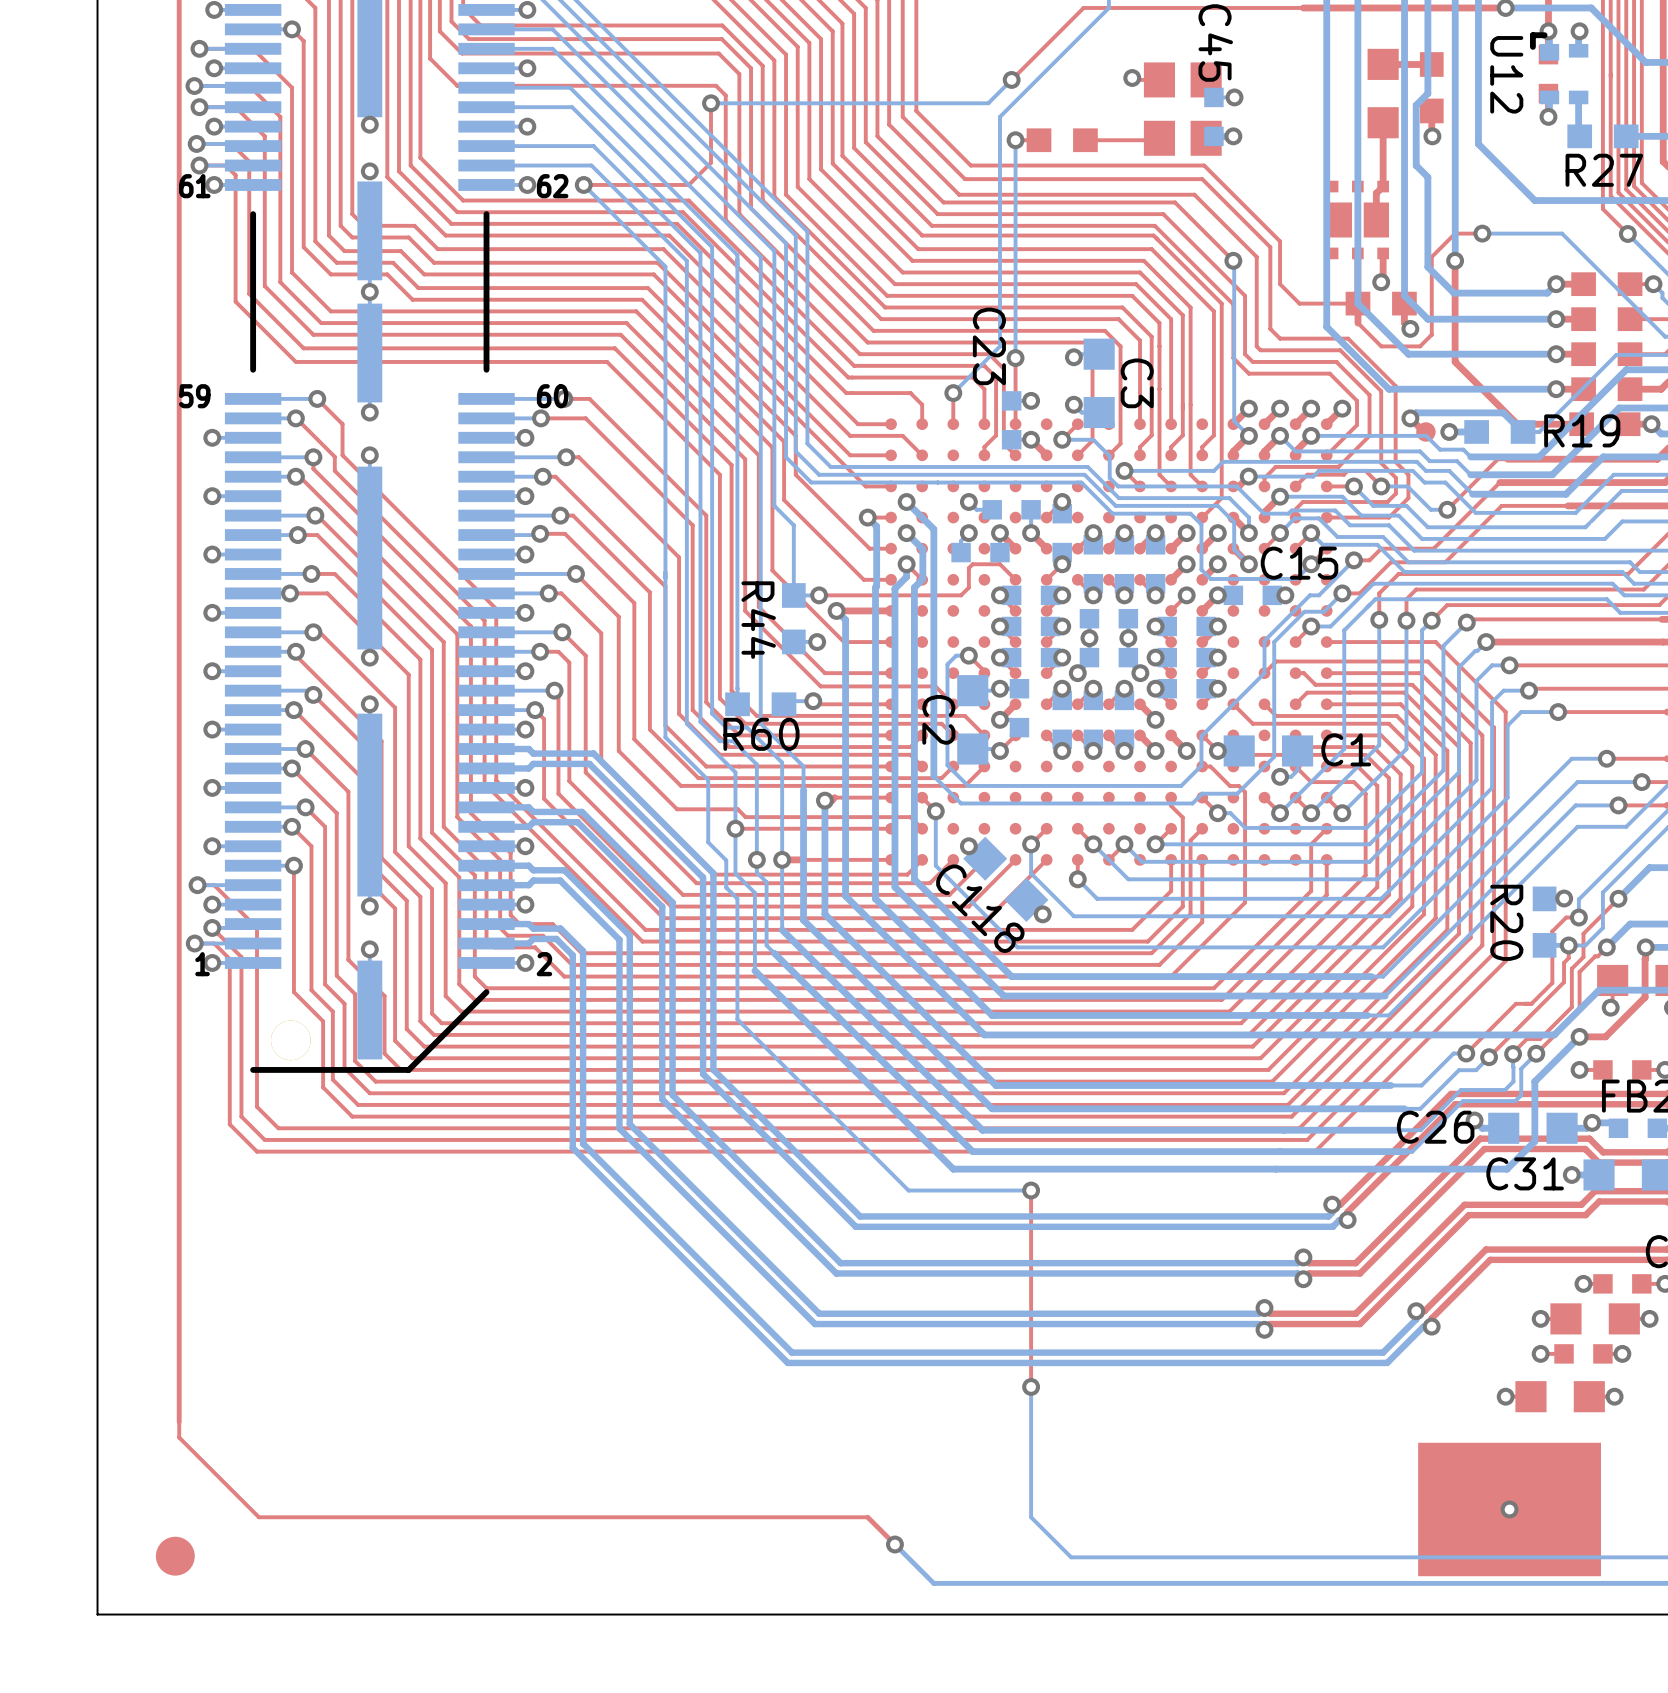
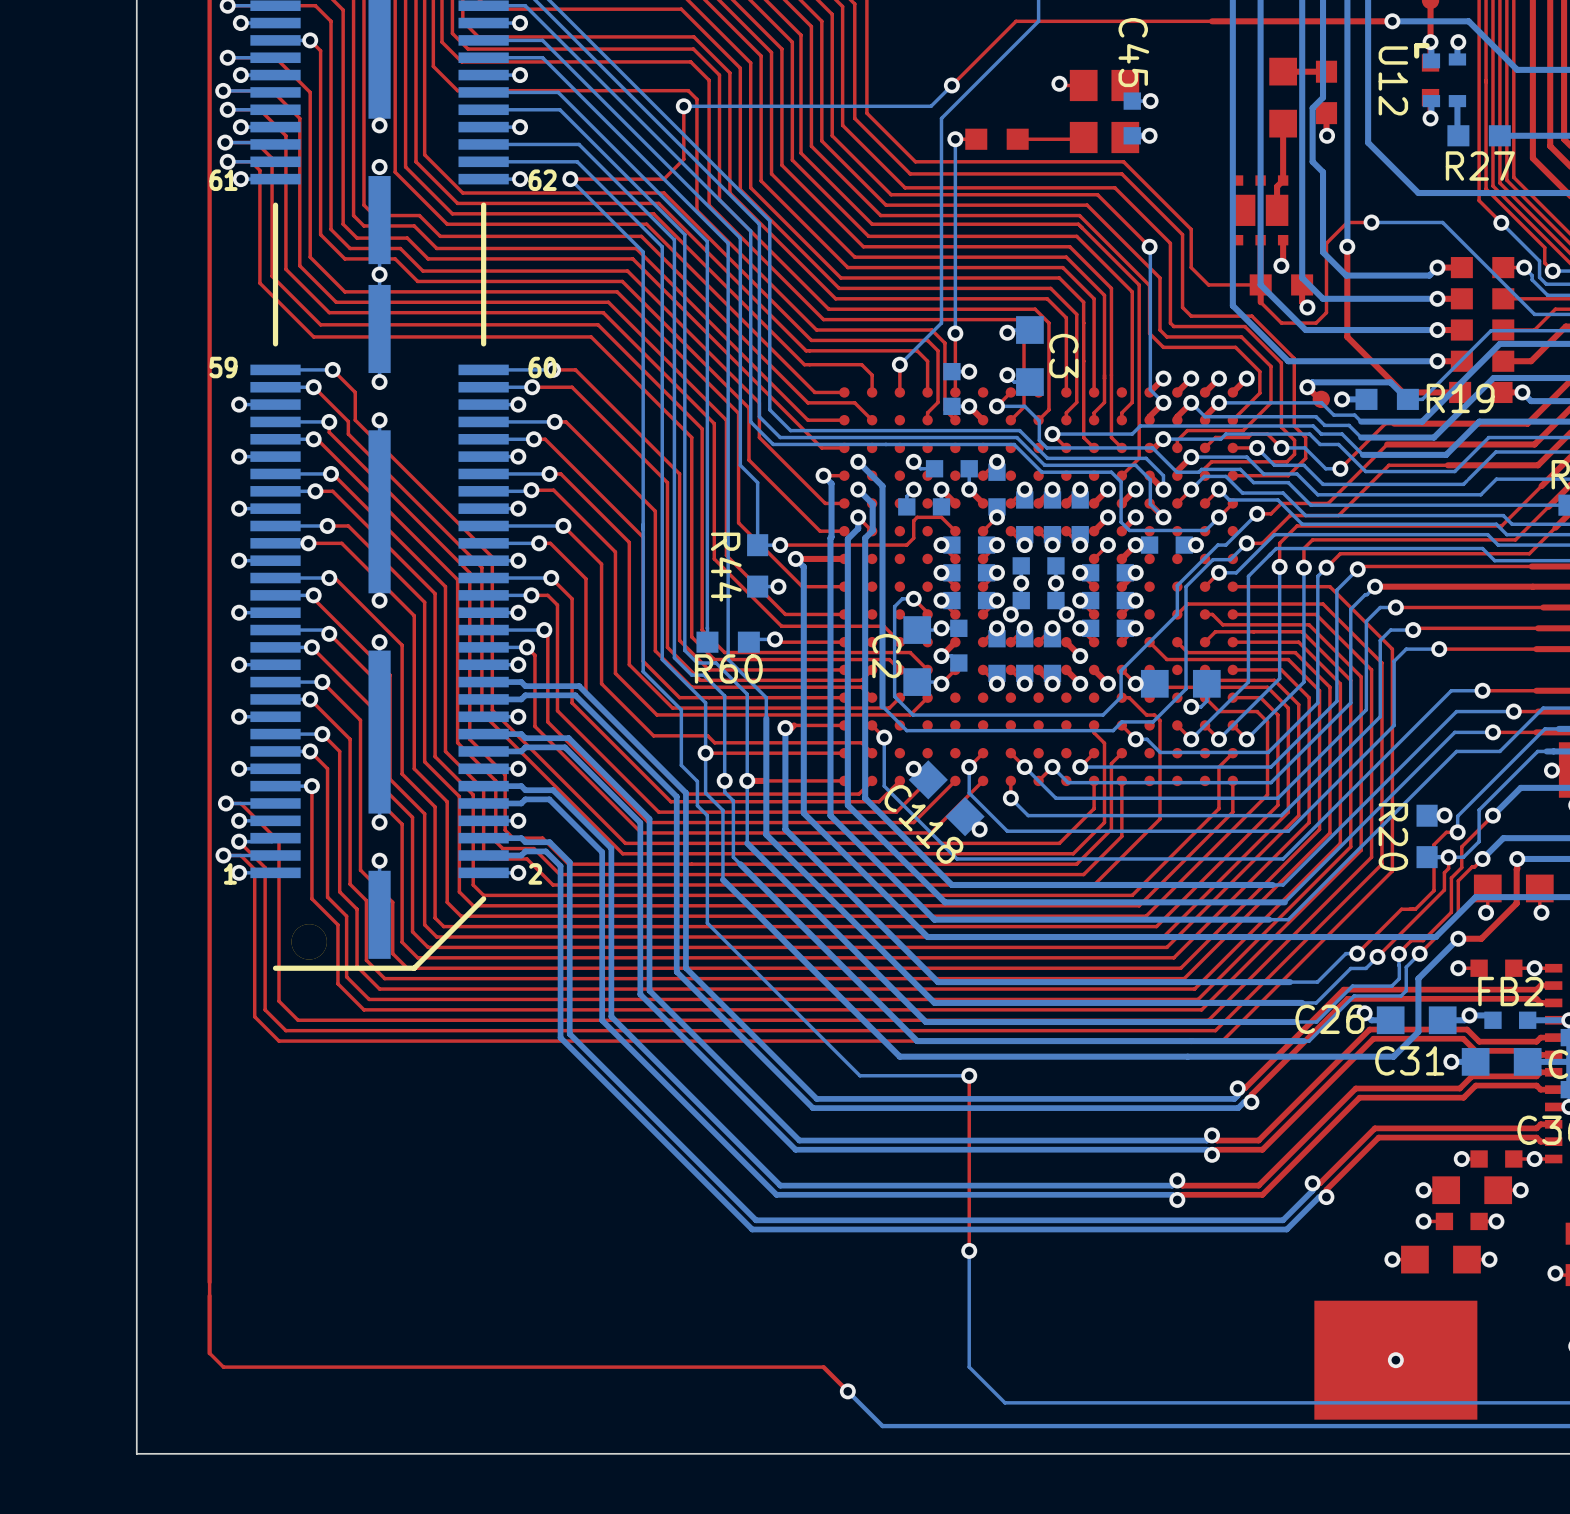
C23 name: C23 (989, 346) -> none
C15 name: C15 (1299, 563) -> none
C1 name: C1 (1346, 749) -> none
top track: (179, 1437) (258, 1517) -> (209, 1296) (209, 1353) (223, 1367) (280, 1367)
part: (175, 1556) -> none

